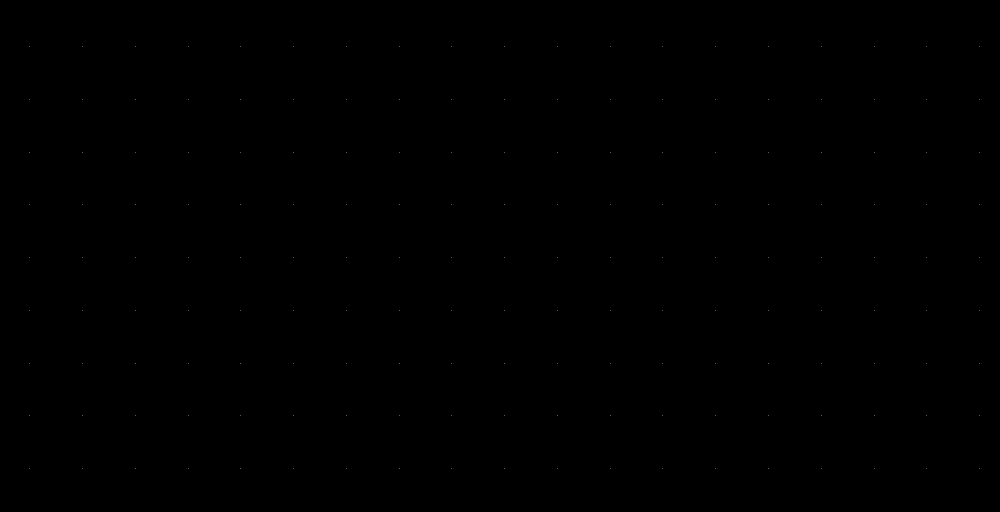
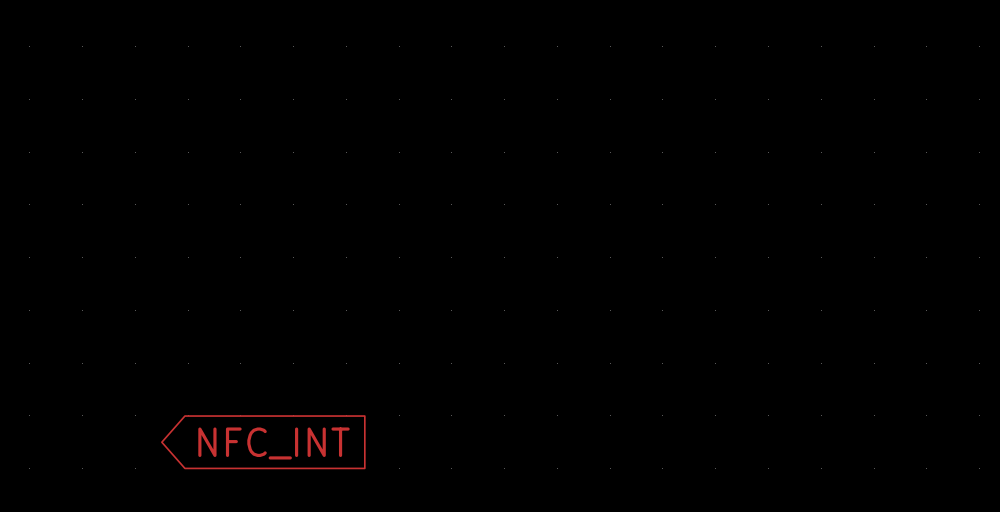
global label: none -> NFC_INT (273, 443)

